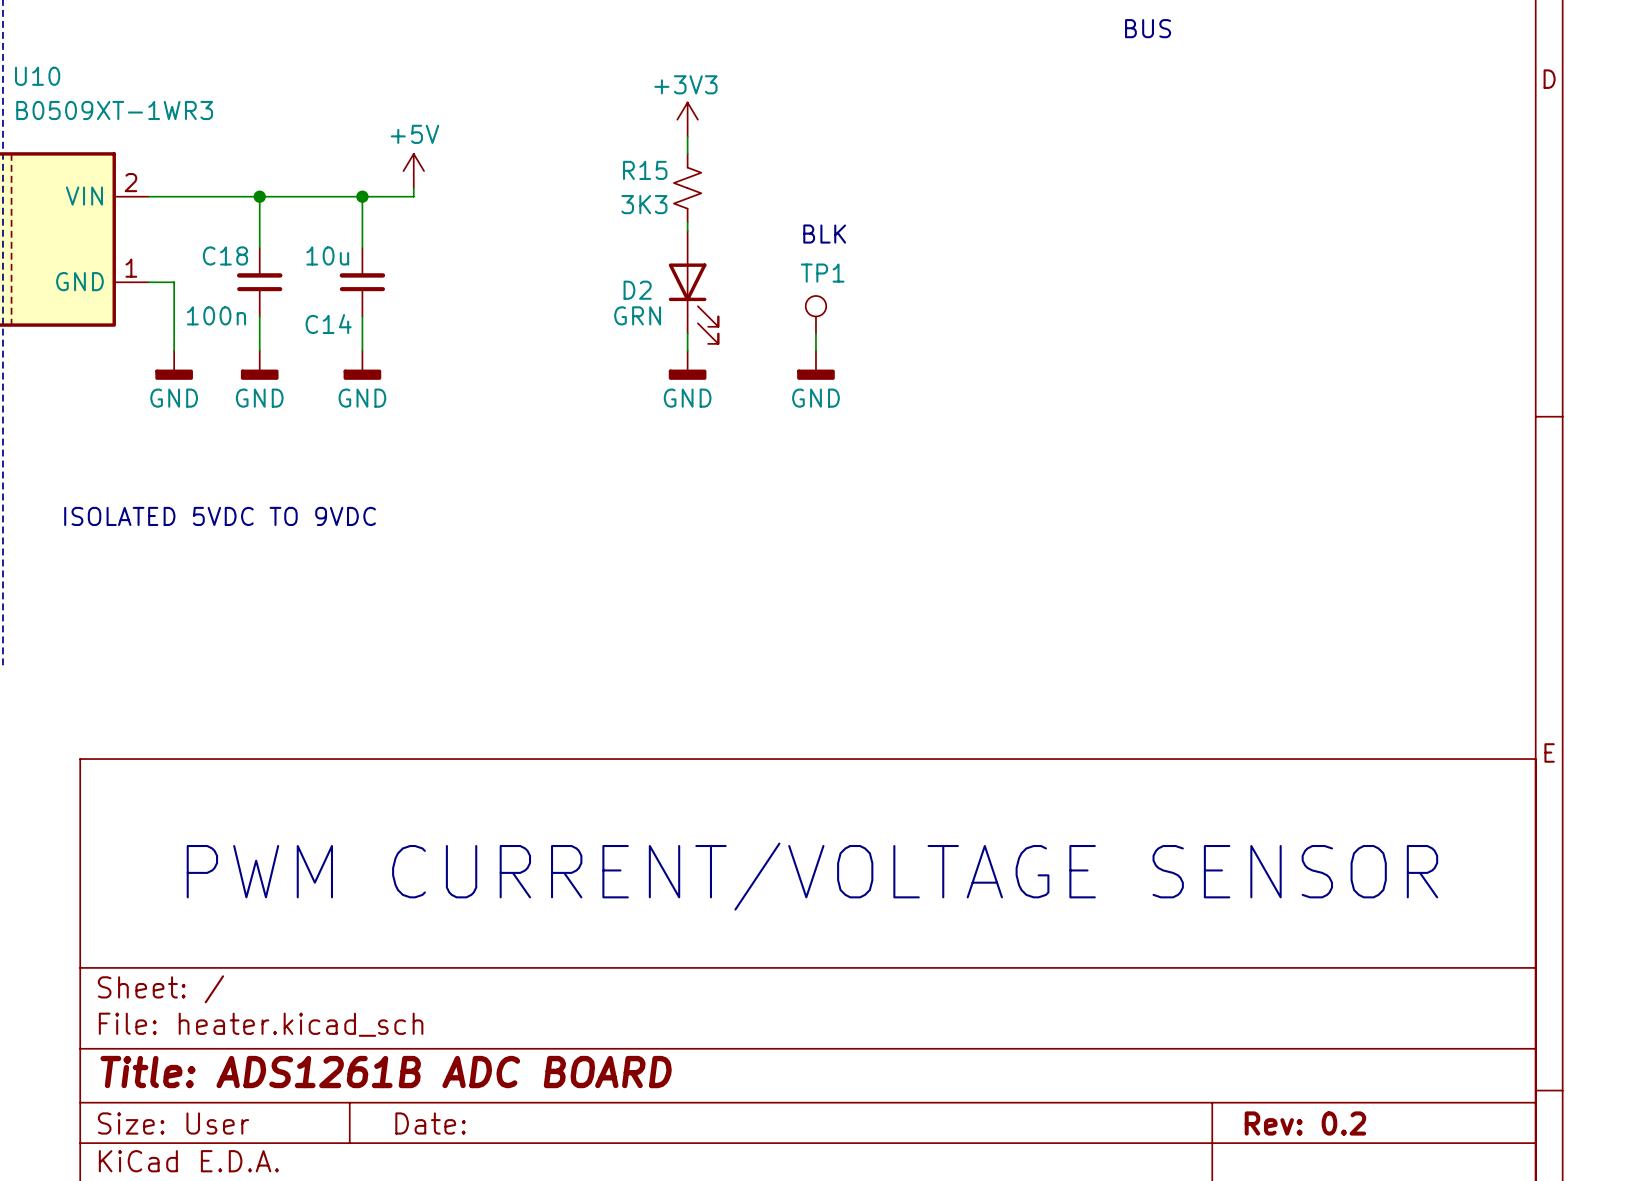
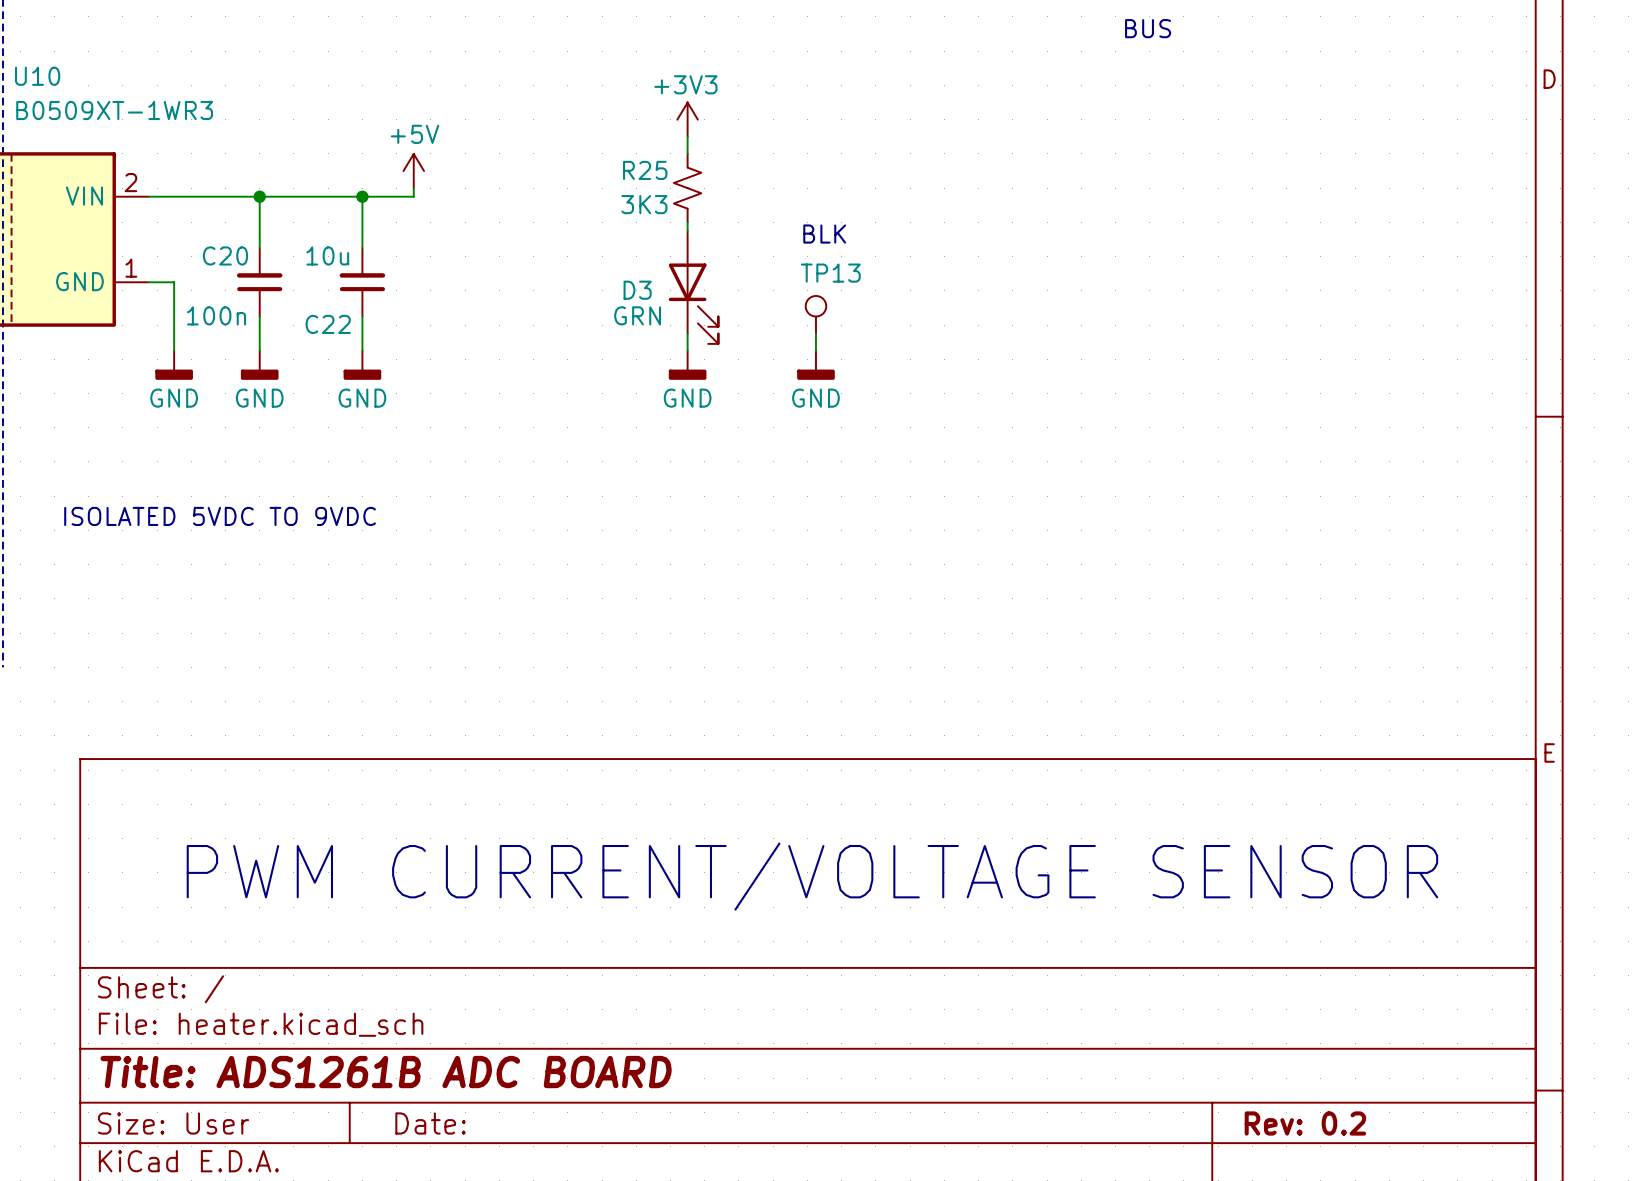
R15 name: R15 (645, 170) -> R25 (645, 170)
C18 name: C18 (225, 255) -> C20 (225, 255)
TP1 name: TP1 (822, 273) -> TP13 (830, 273)
D2 name: D2 (637, 290) -> D3 (637, 290)
C14 name: C14 (328, 324) -> C22 (328, 324)

